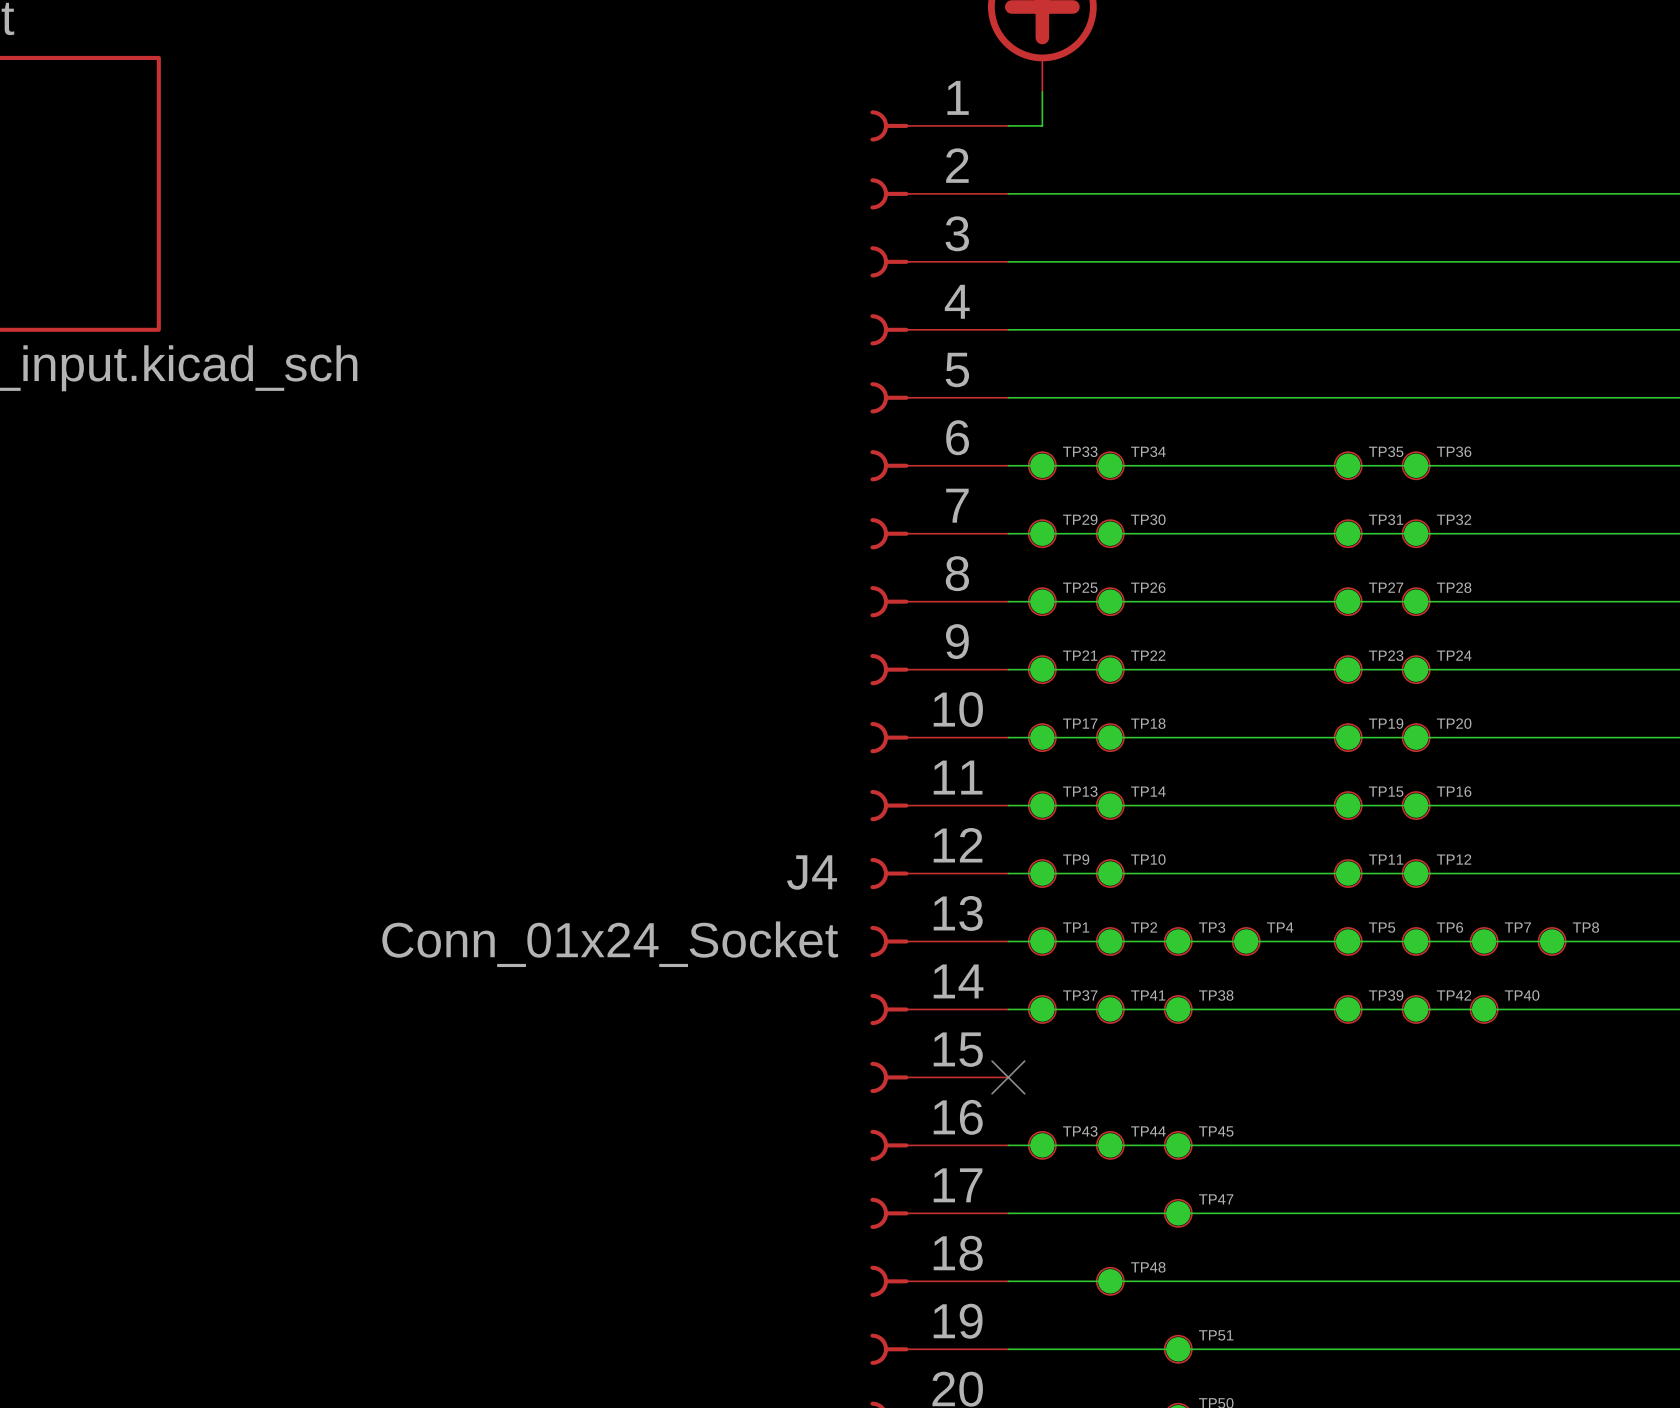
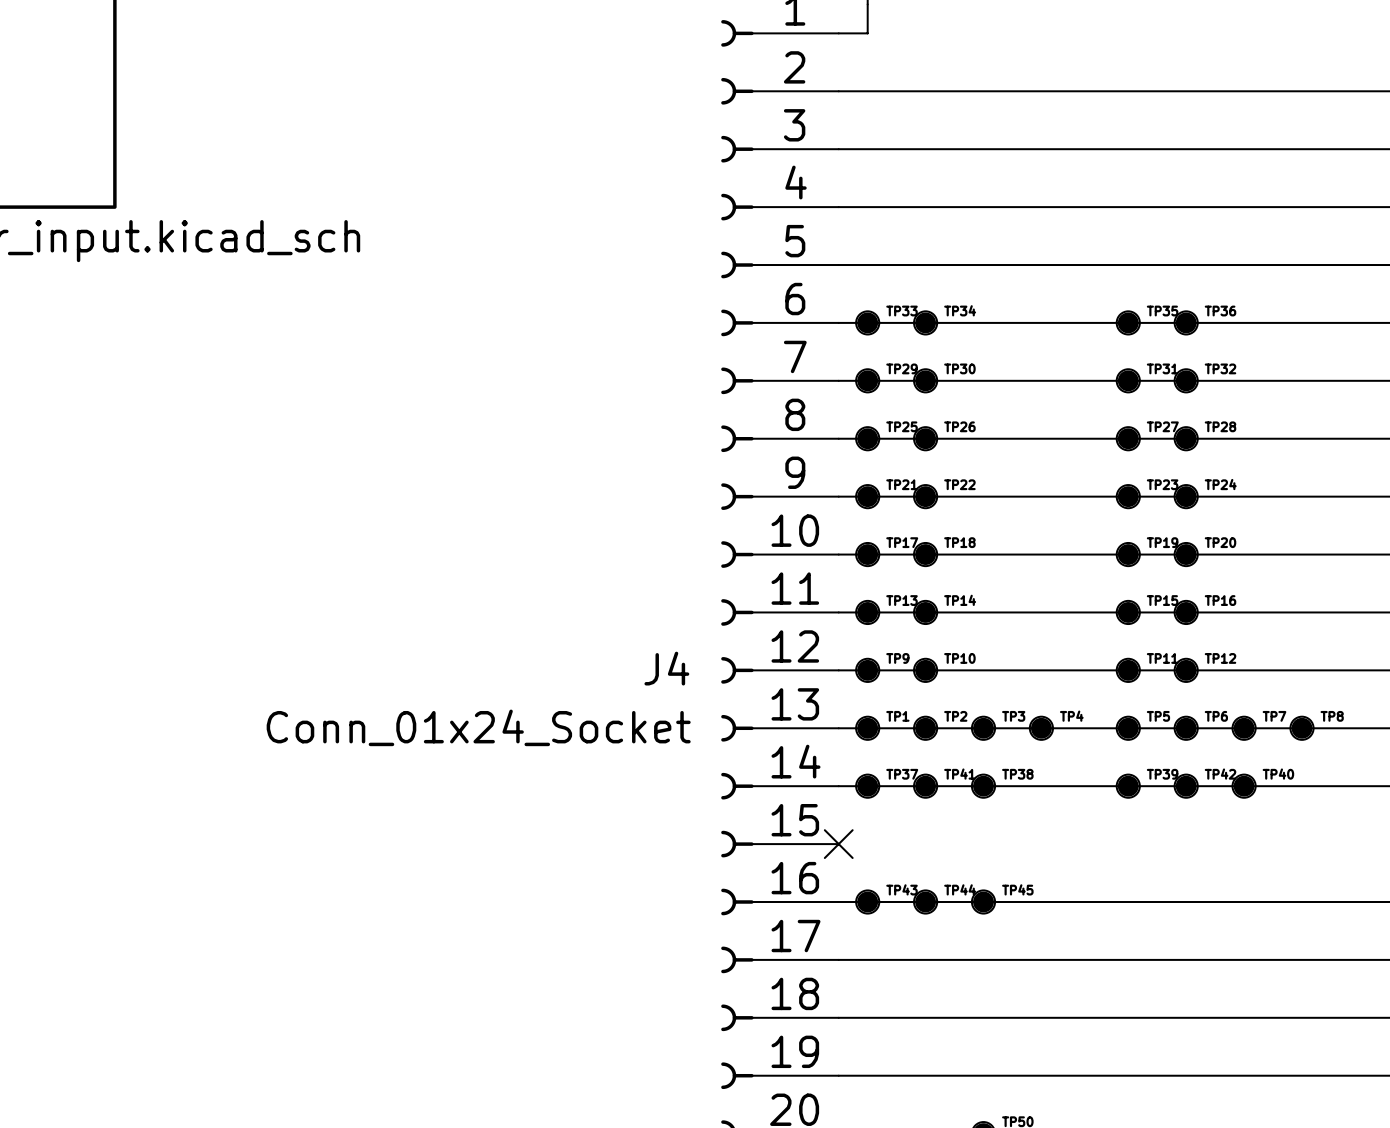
junction: (1178, 1213) -> none
TP47: (1178, 1213) -> none
junction: (1110, 1281) -> none
TP48: (1110, 1281) -> none
junction: (1178, 1349) -> none
TP51: (1178, 1349) -> none

